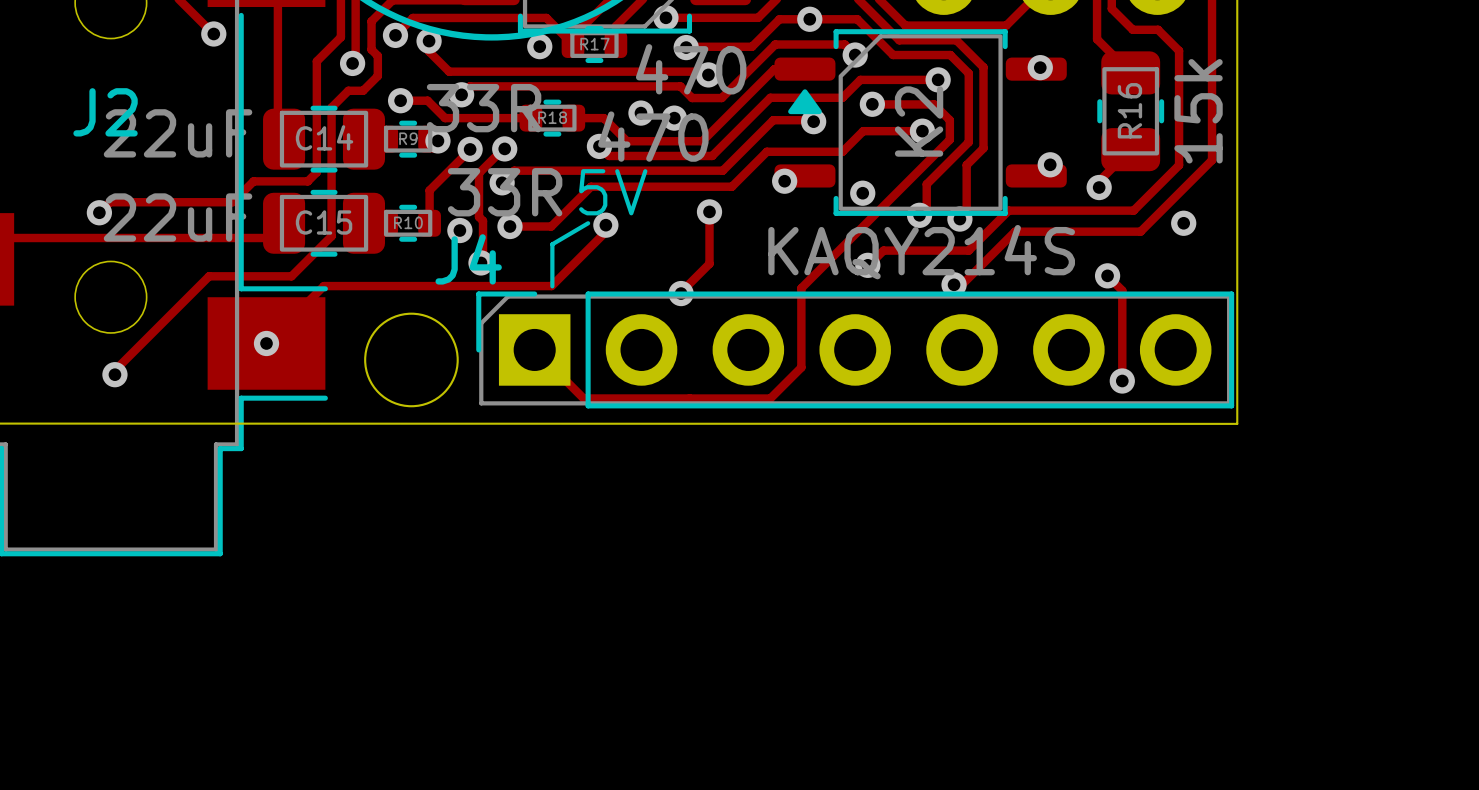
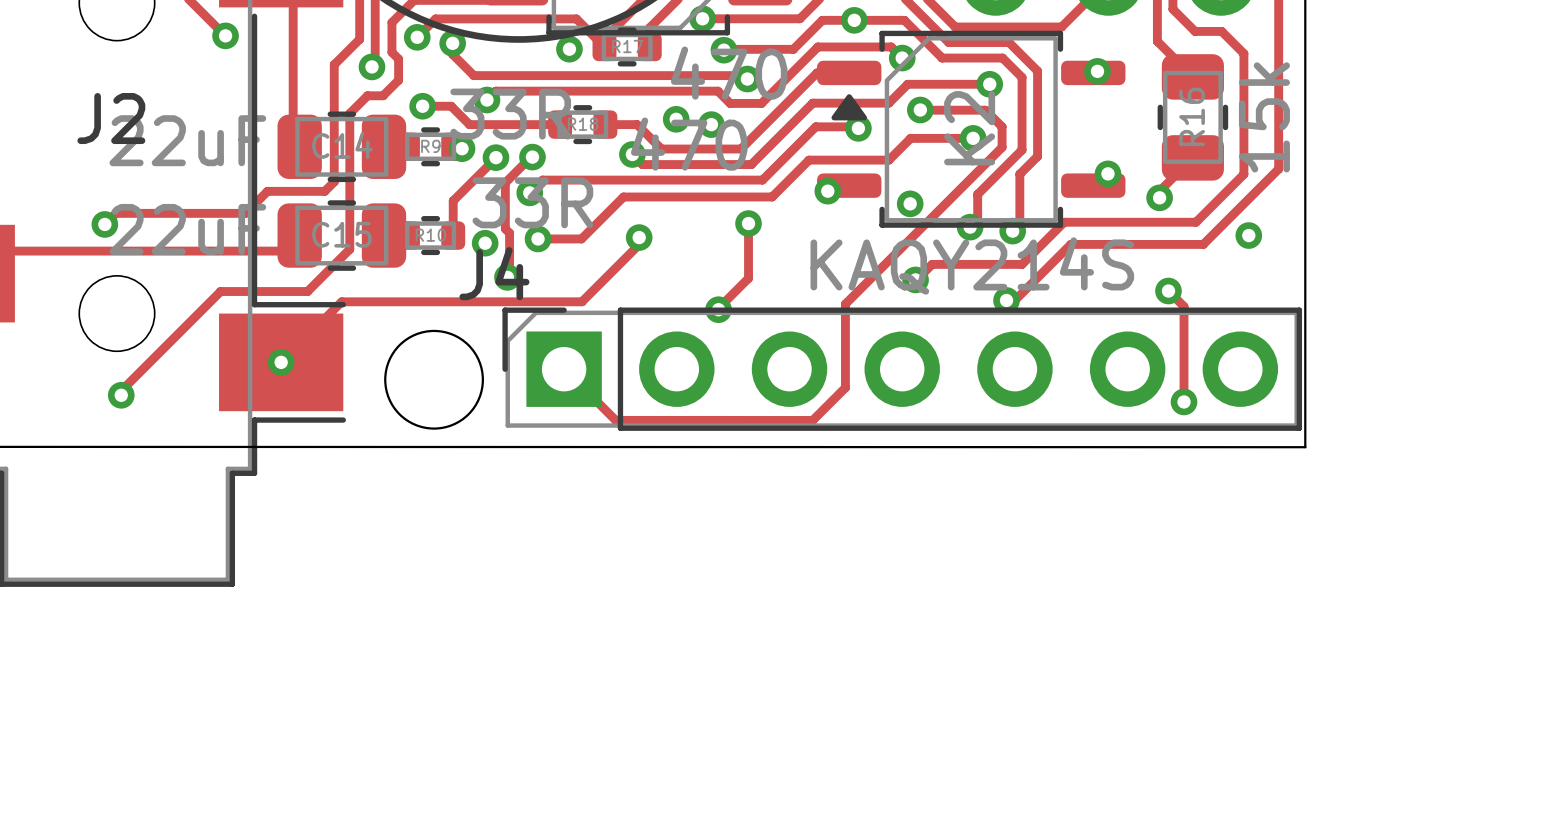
text: 5V (613, 192) -> none
line: (588, 223) (552, 244) (552, 286) -> none

